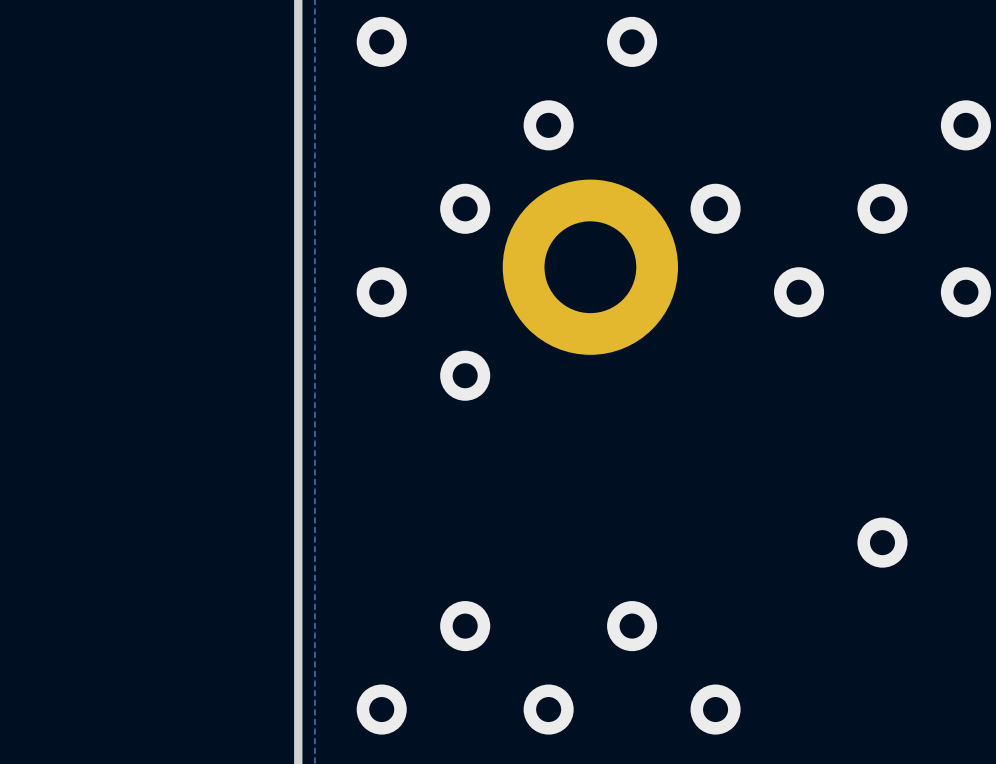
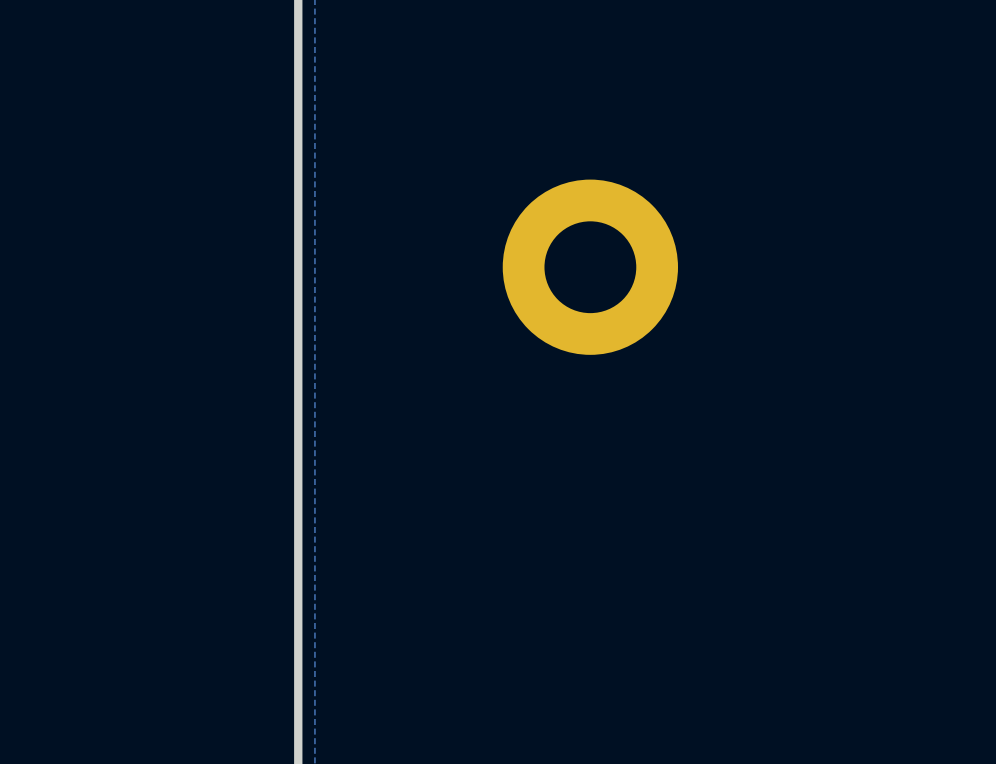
via: (381, 41) -> none
via: (632, 41) -> none
via: (548, 125) -> none
via: (965, 125) -> none
via: (465, 208) -> none
via: (715, 208) -> none
via: (882, 208) -> none
via: (381, 292) -> none
via: (799, 292) -> none
via: (965, 292) -> none
via: (465, 375) -> none
via: (882, 542) -> none
via: (465, 626) -> none
via: (632, 626) -> none
via: (381, 709) -> none
via: (548, 709) -> none
via: (715, 709) -> none

